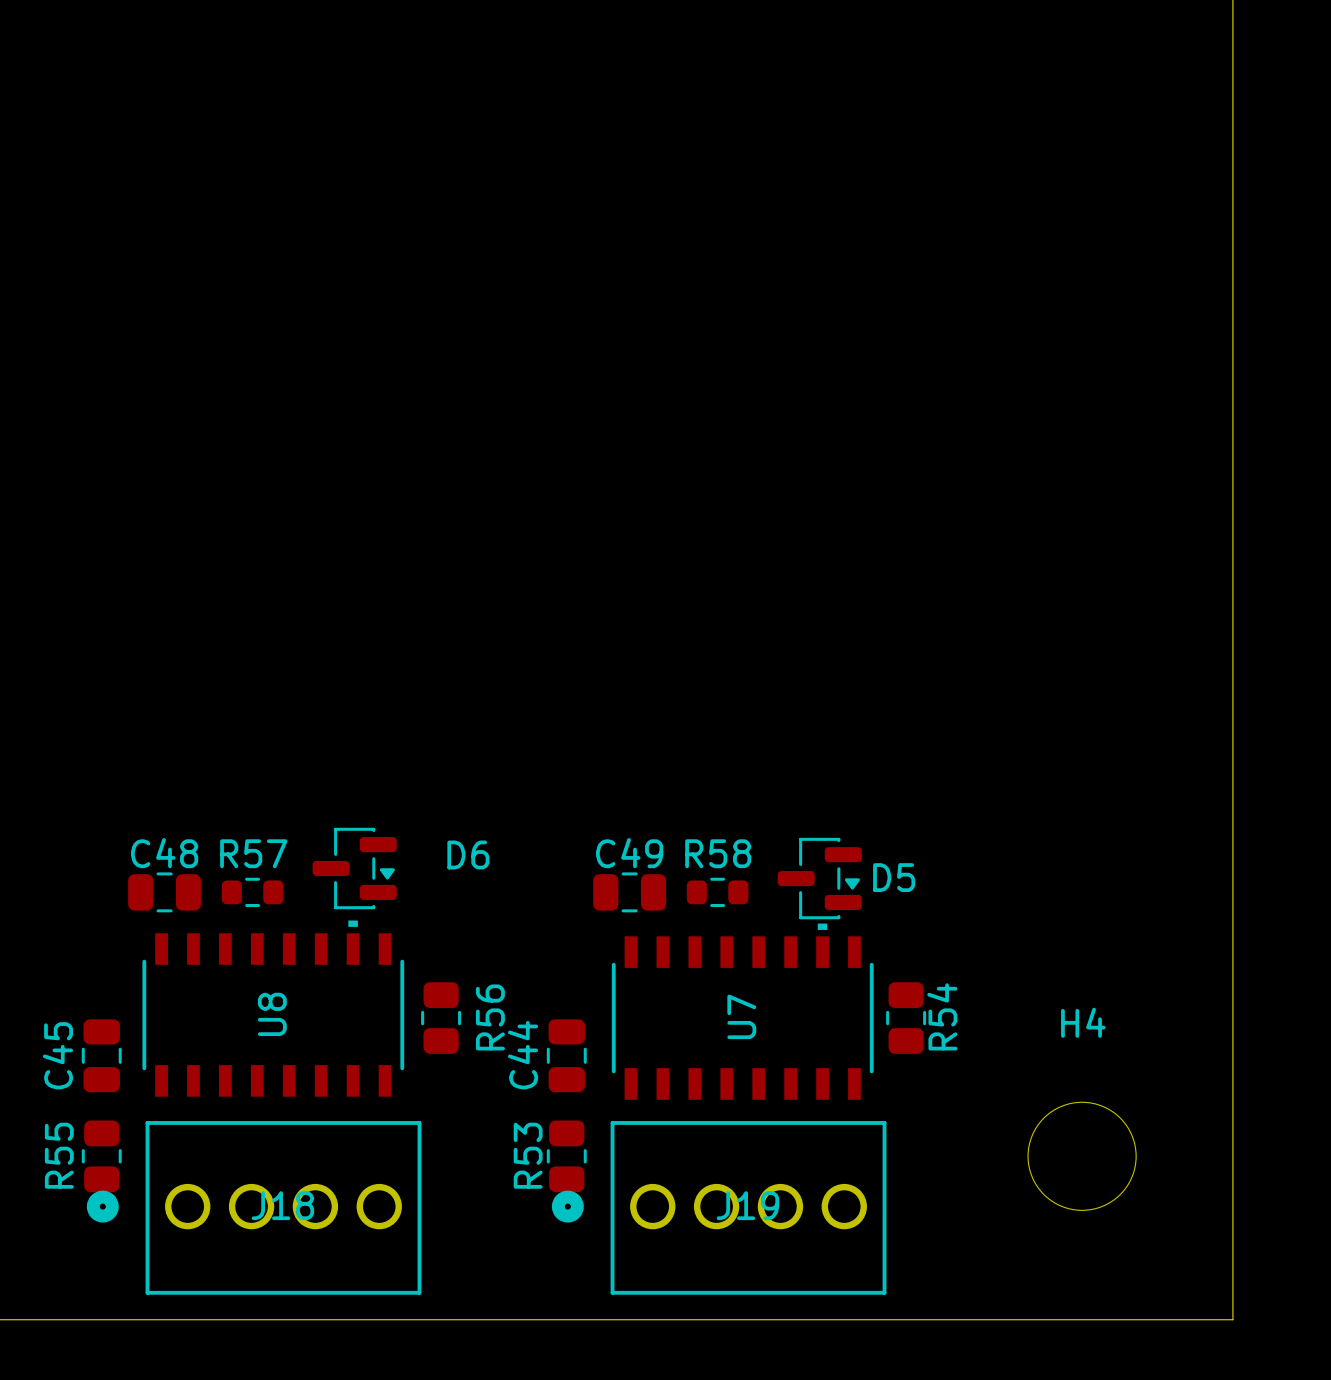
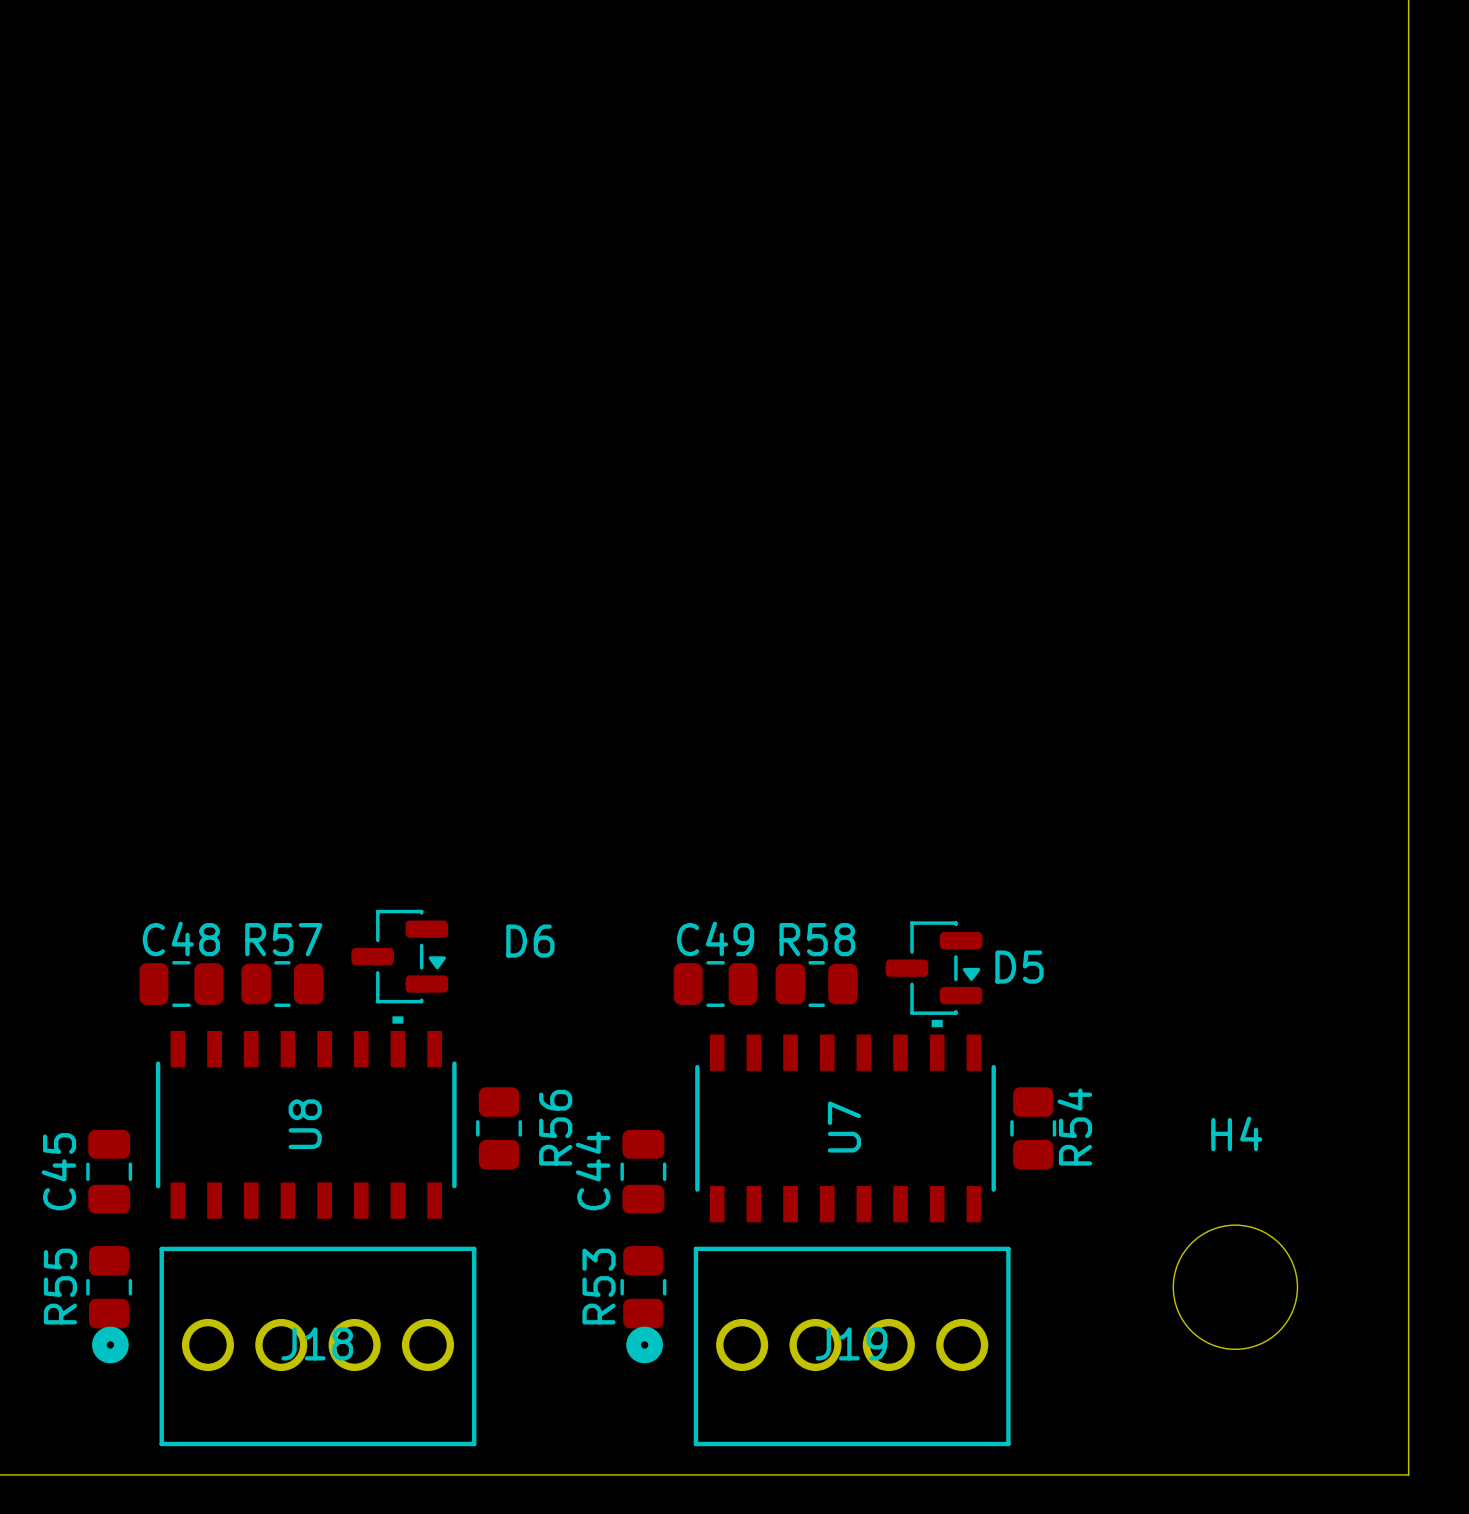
R57 footprint: [221, 877, 284, 908] -> [241, 961, 324, 1007]
R58 footprint: [686, 877, 749, 908] -> [775, 961, 858, 1007]

